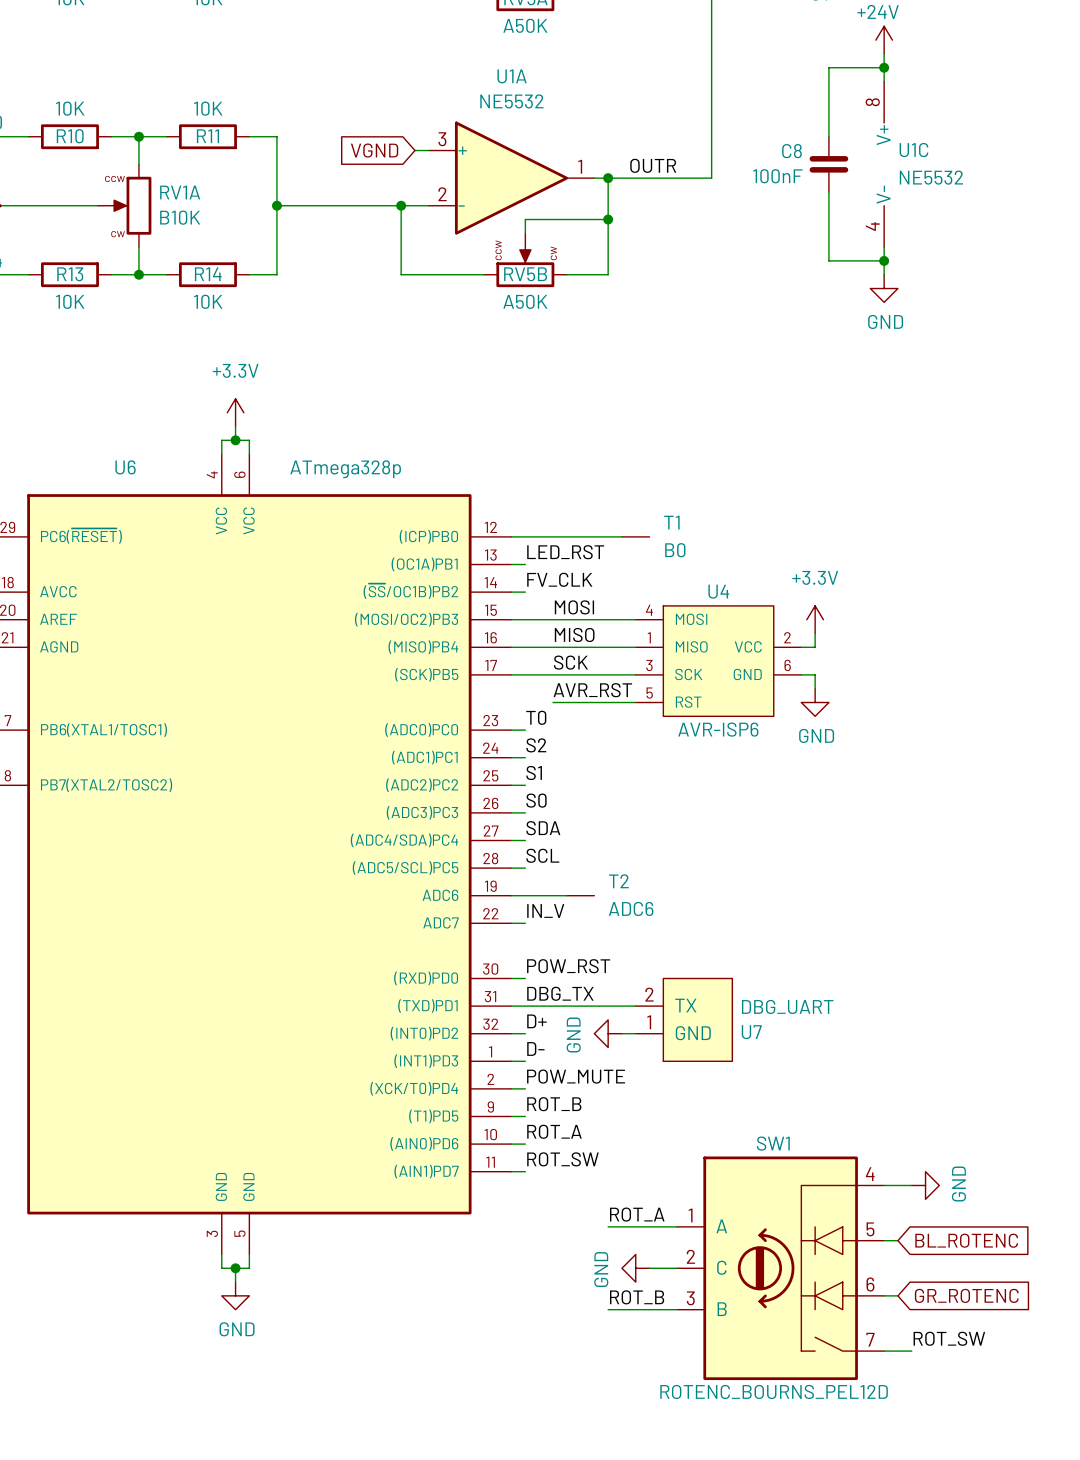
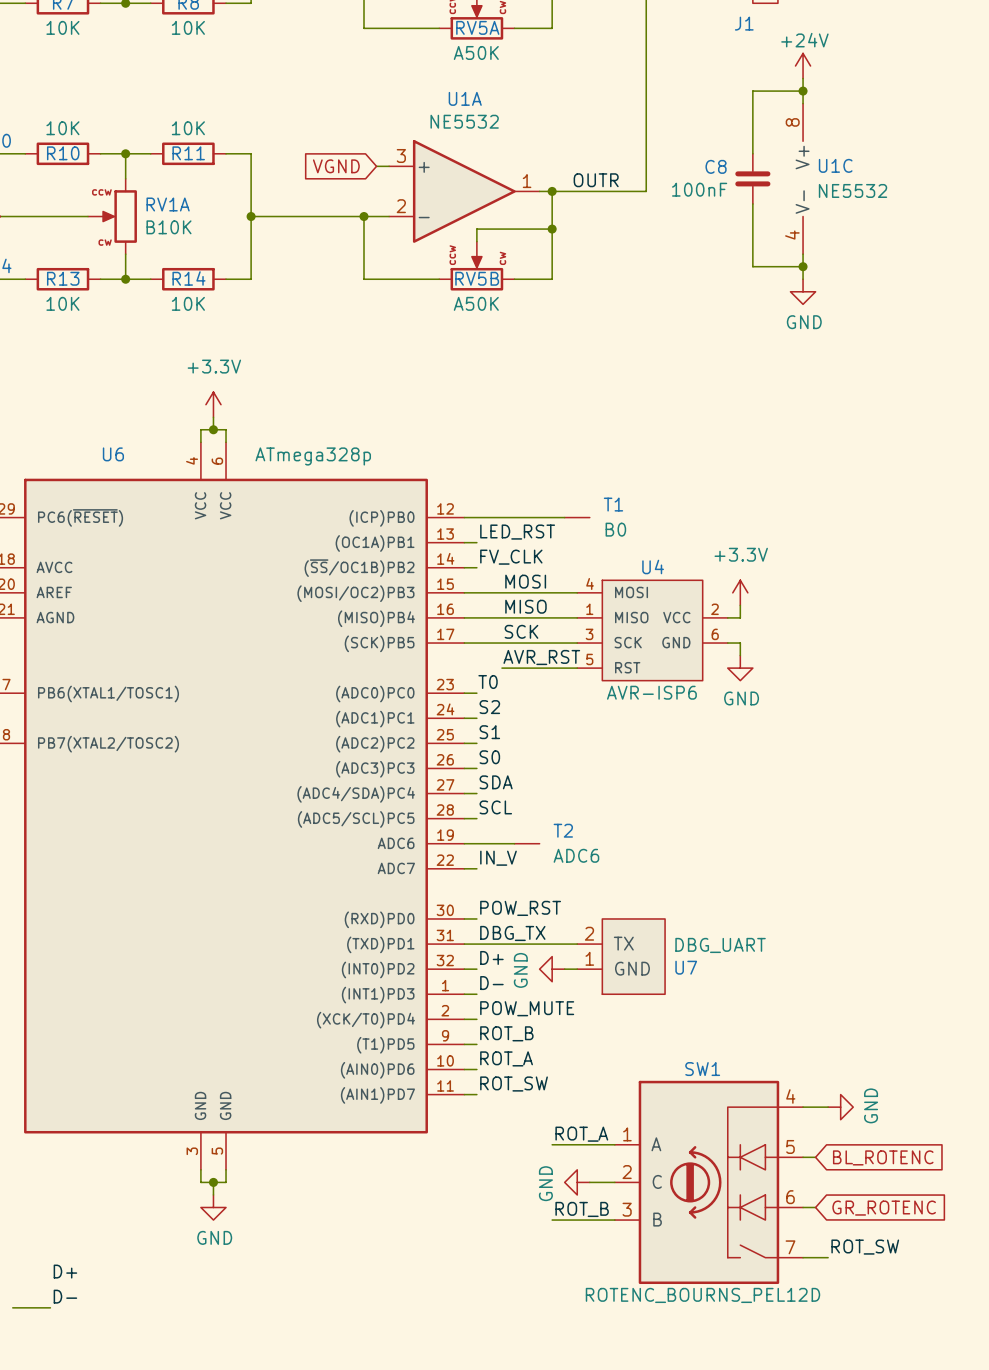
label: none -> D+ (65, 1271)
label: none -> D- (65, 1296)
wire: none -> (12, 1307) (50, 1307)

